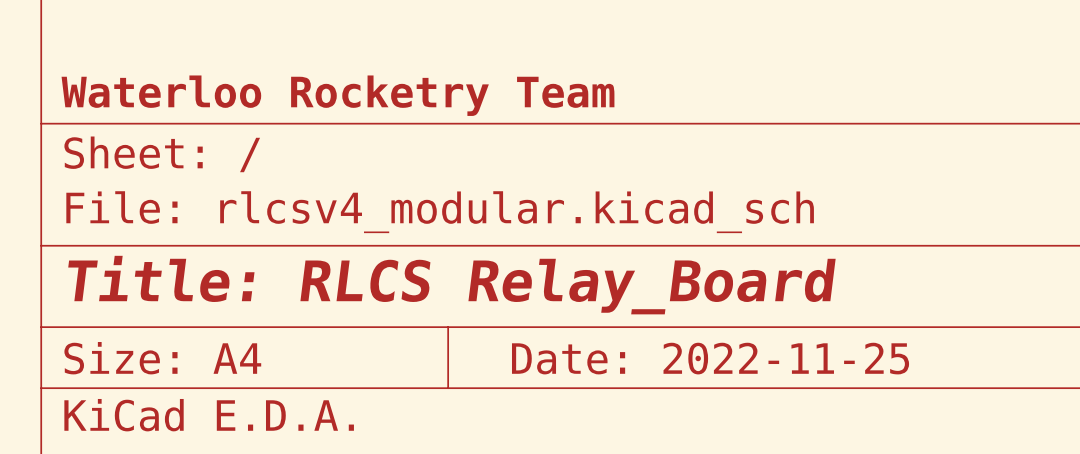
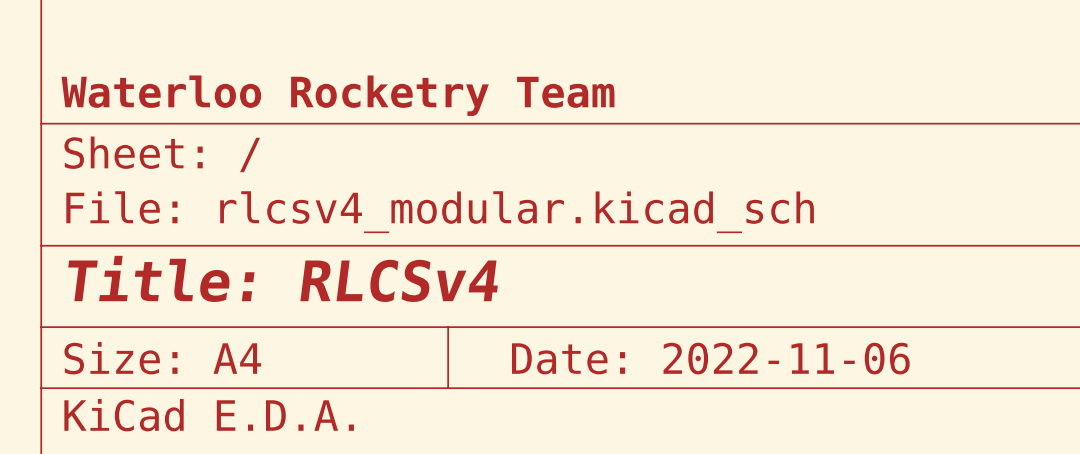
title block: Title: RLCS Relay_Board (451, 285) -> Title: RLCSv4 (283, 278)
title block: Date: 2022-11-25 (710, 358) -> Date: 2022-11-06 (710, 358)

